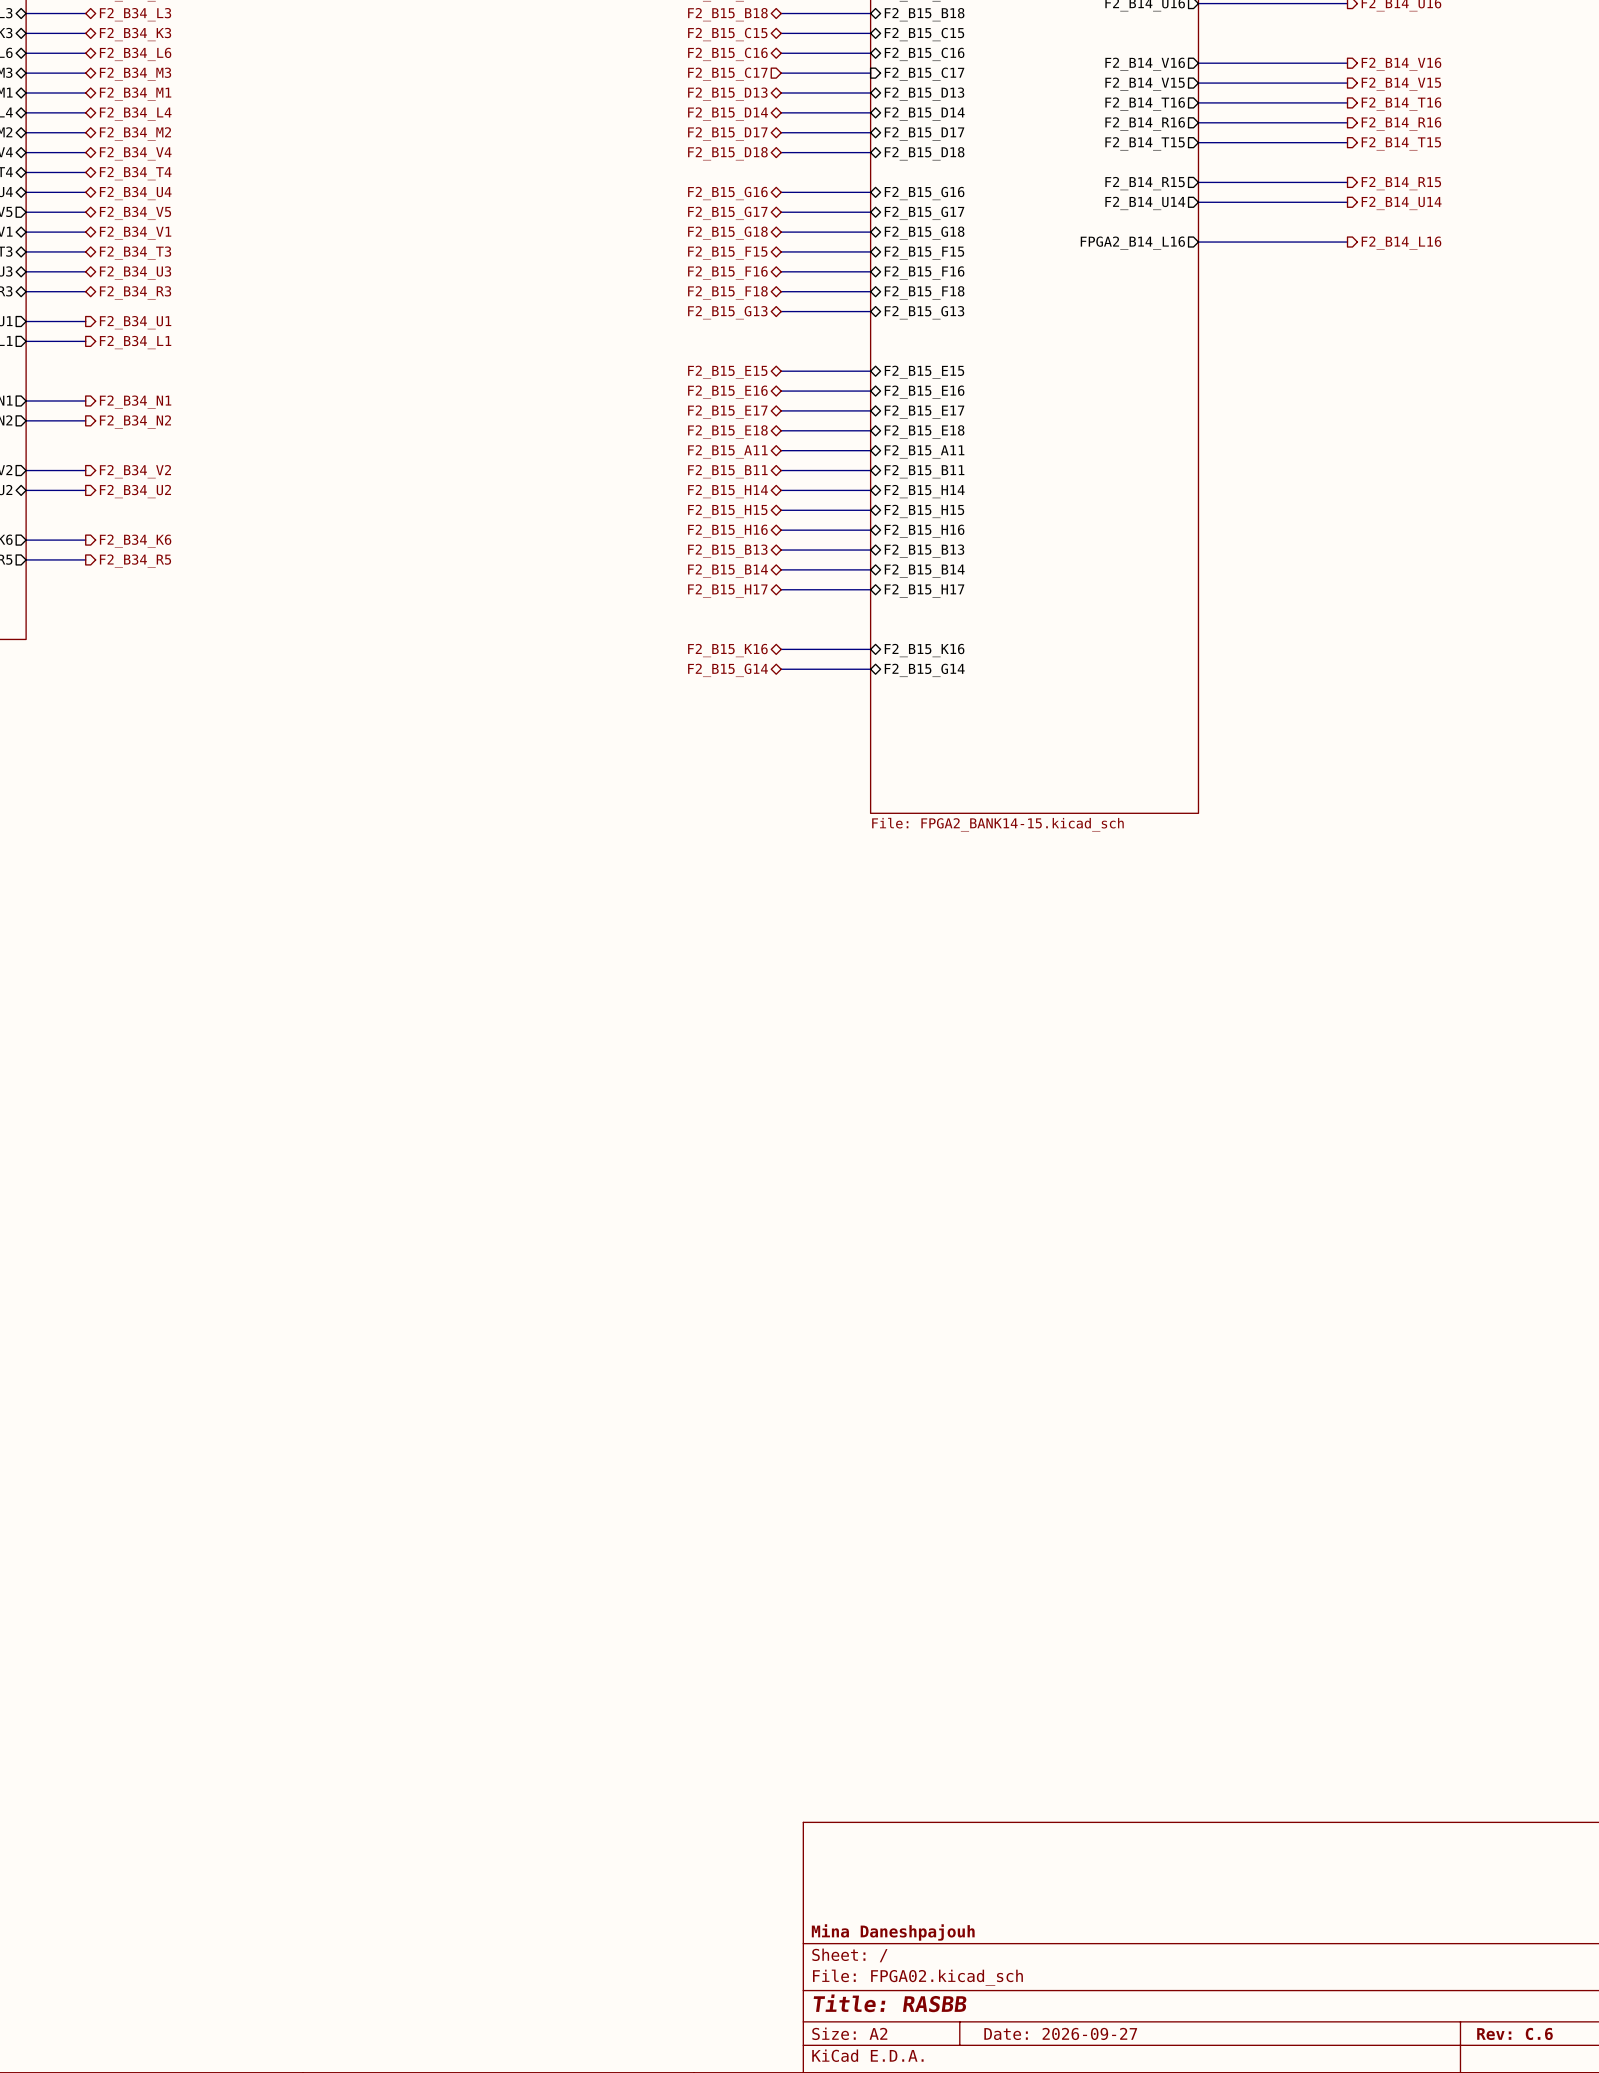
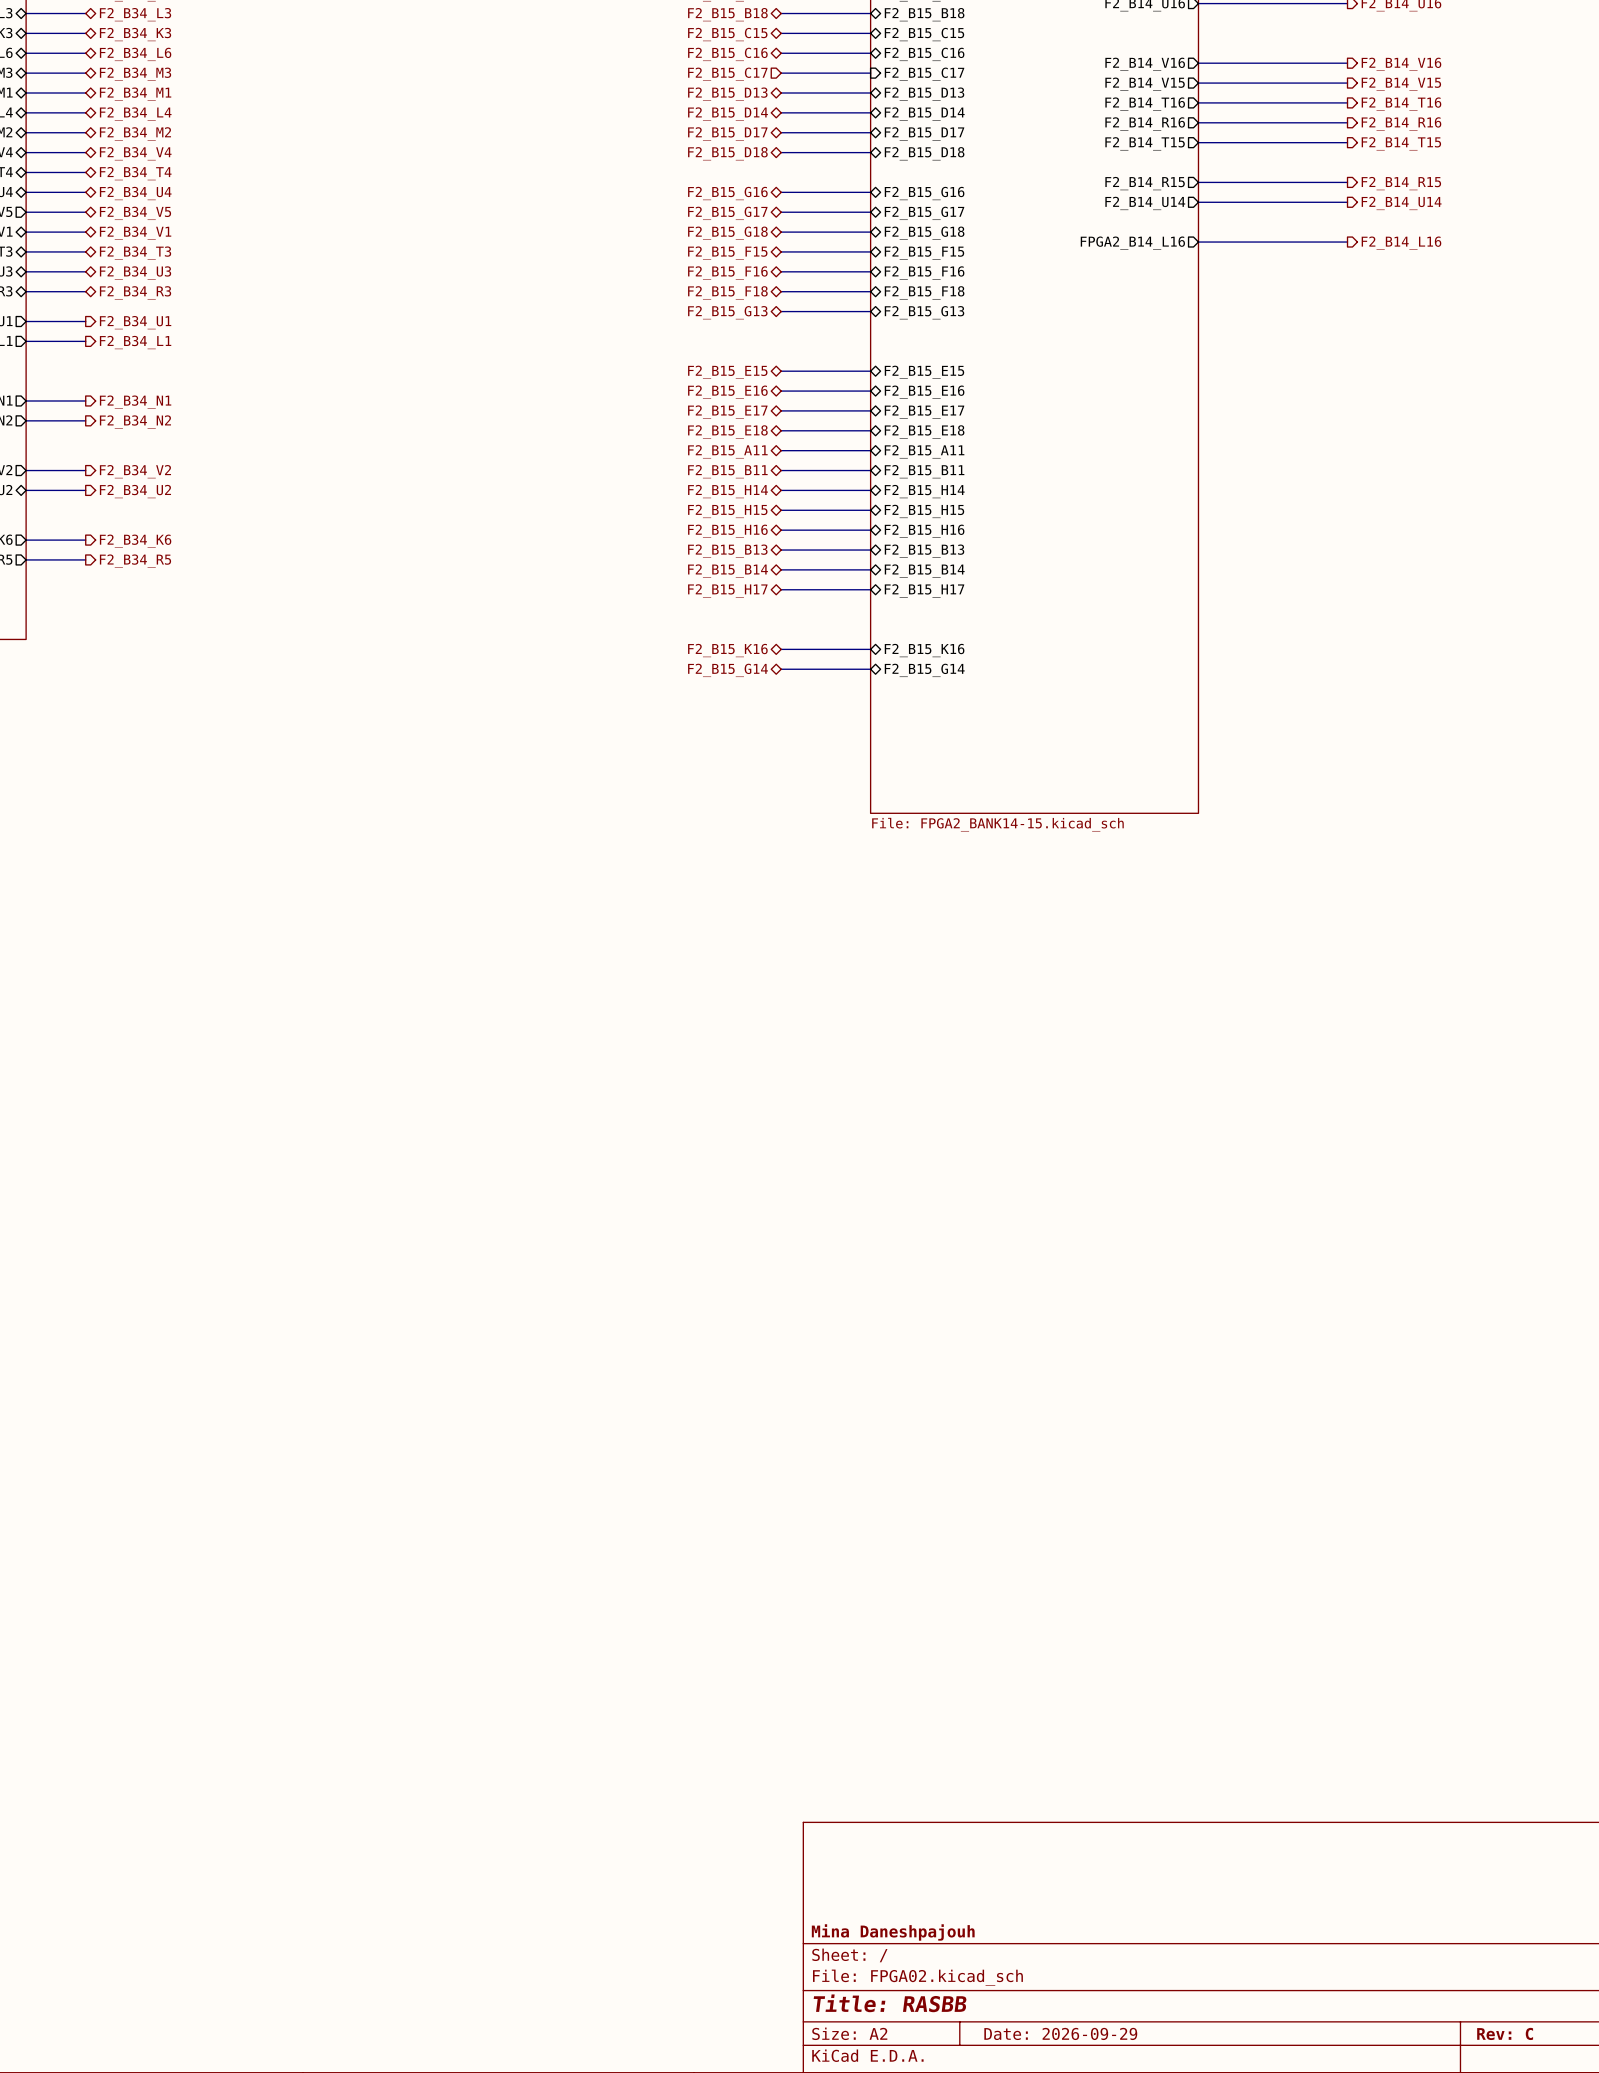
title block: Date: 2026-09-27 (1060, 2033) -> Date: 2026-09-29 (1060, 2033)
title block: Rev: C.6 (1514, 2033) -> Rev: C (1505, 2033)

